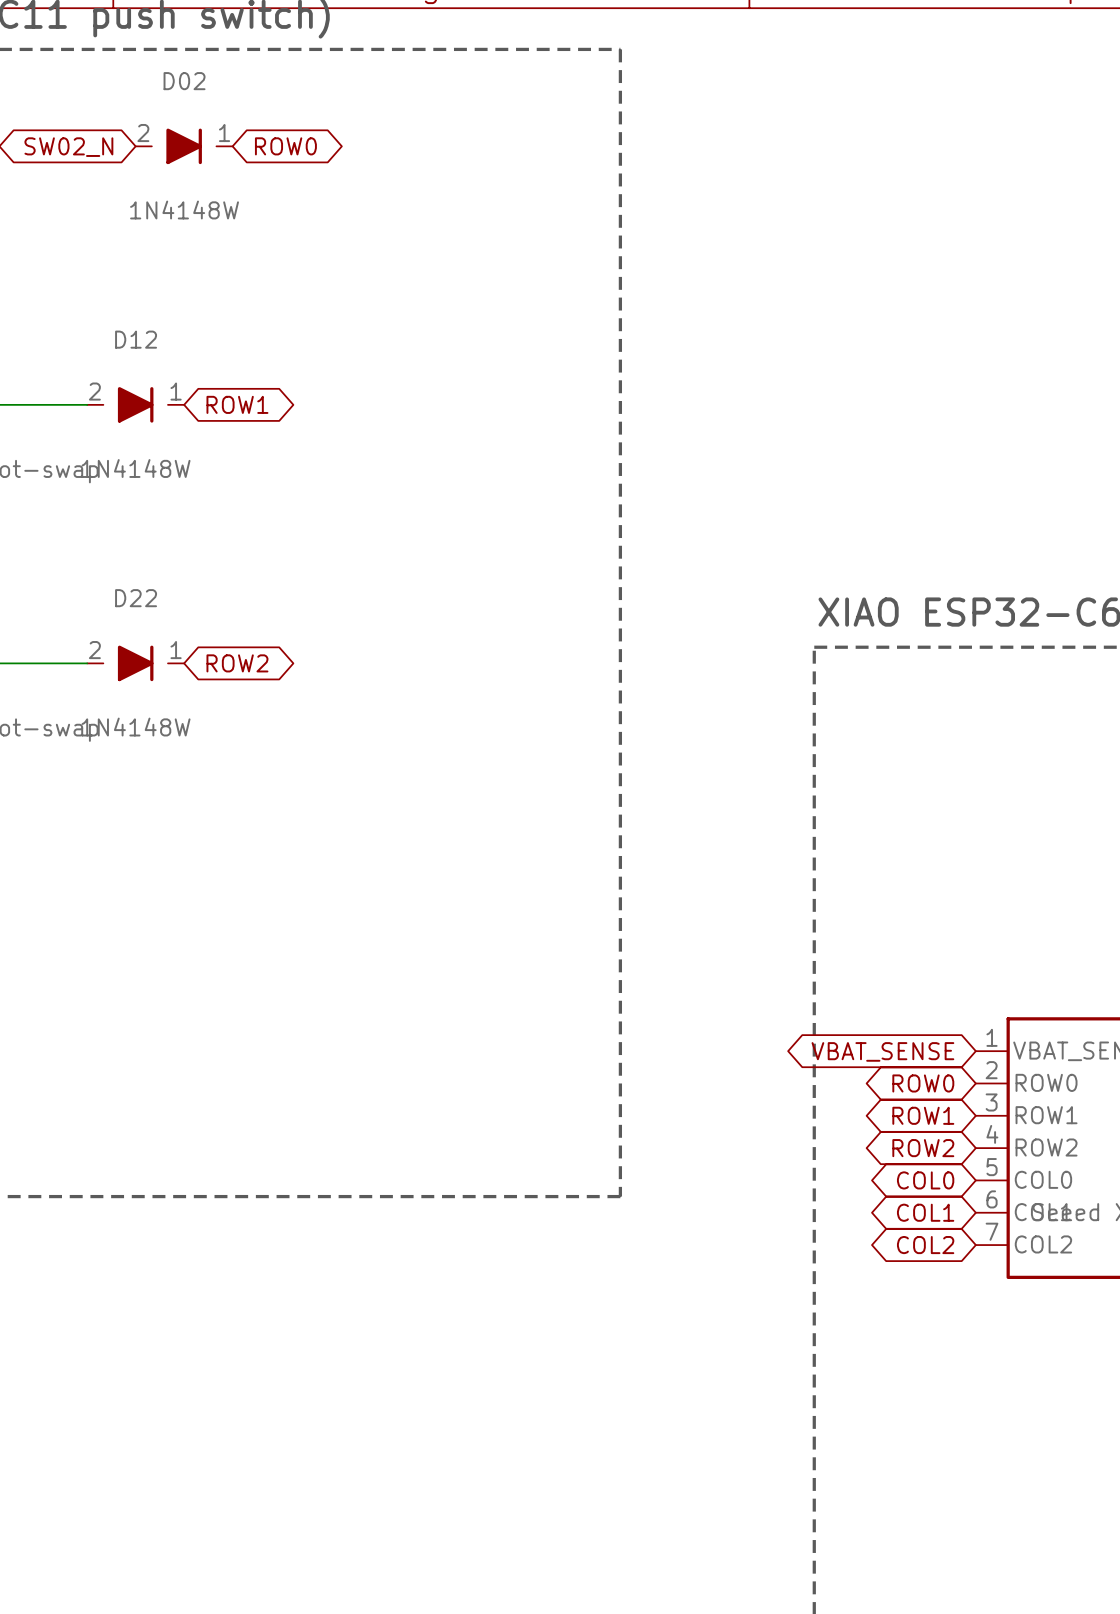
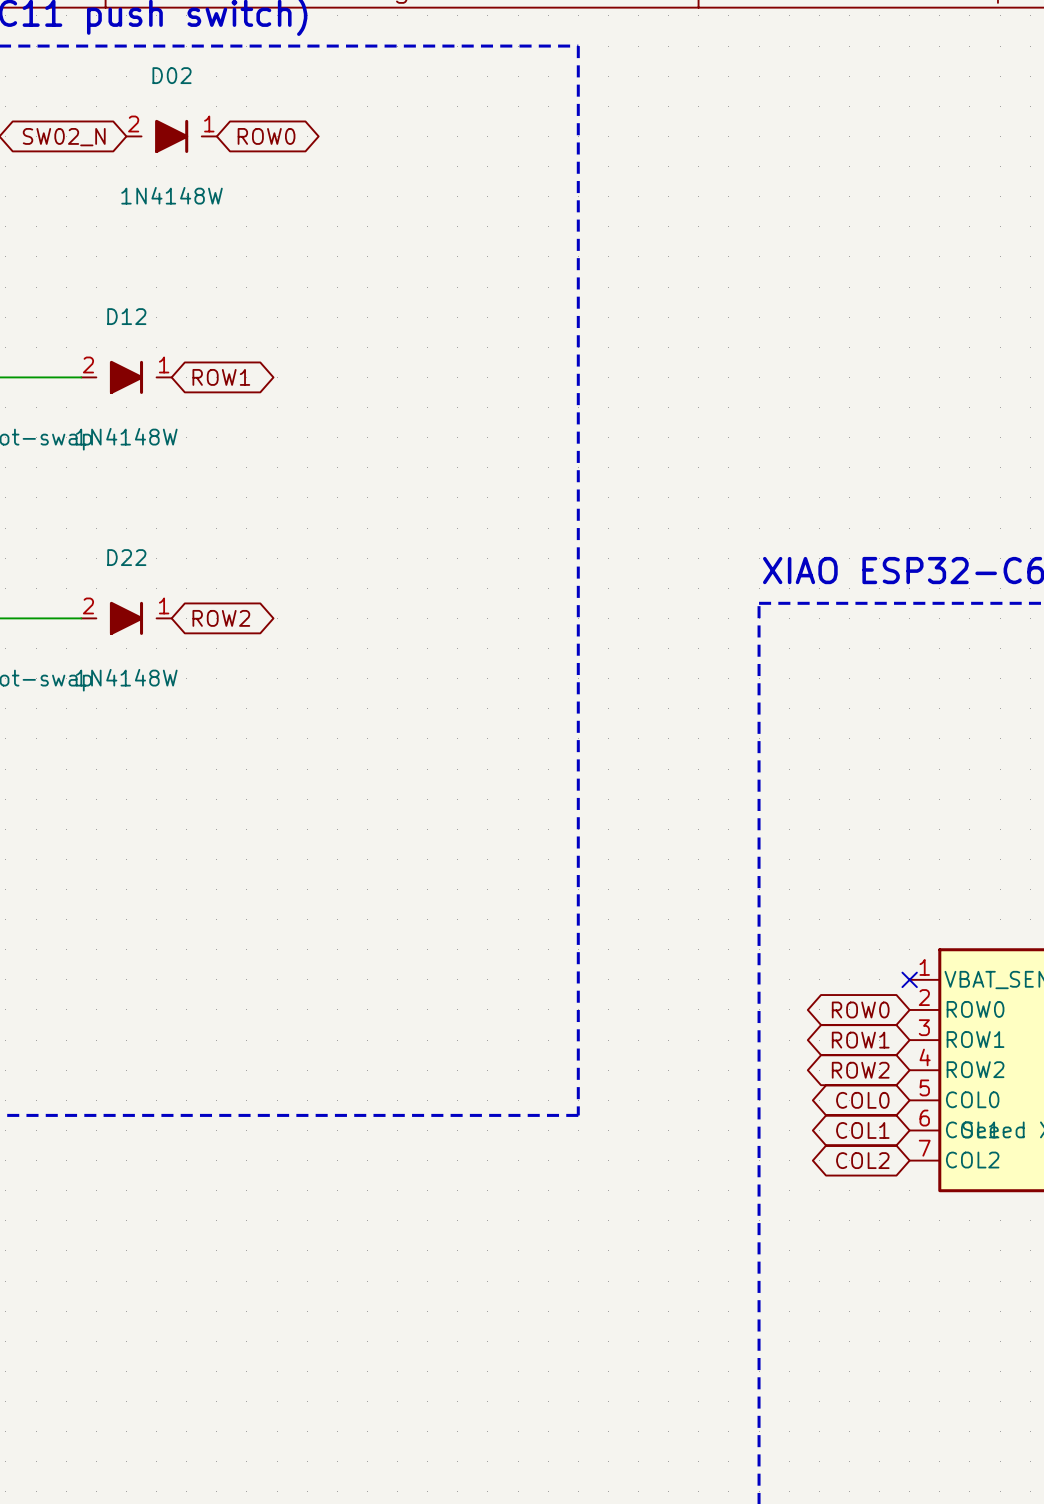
global label: VBAT_SENSE (882, 1051) -> none
no-connect mark: none -> (909, 979)

